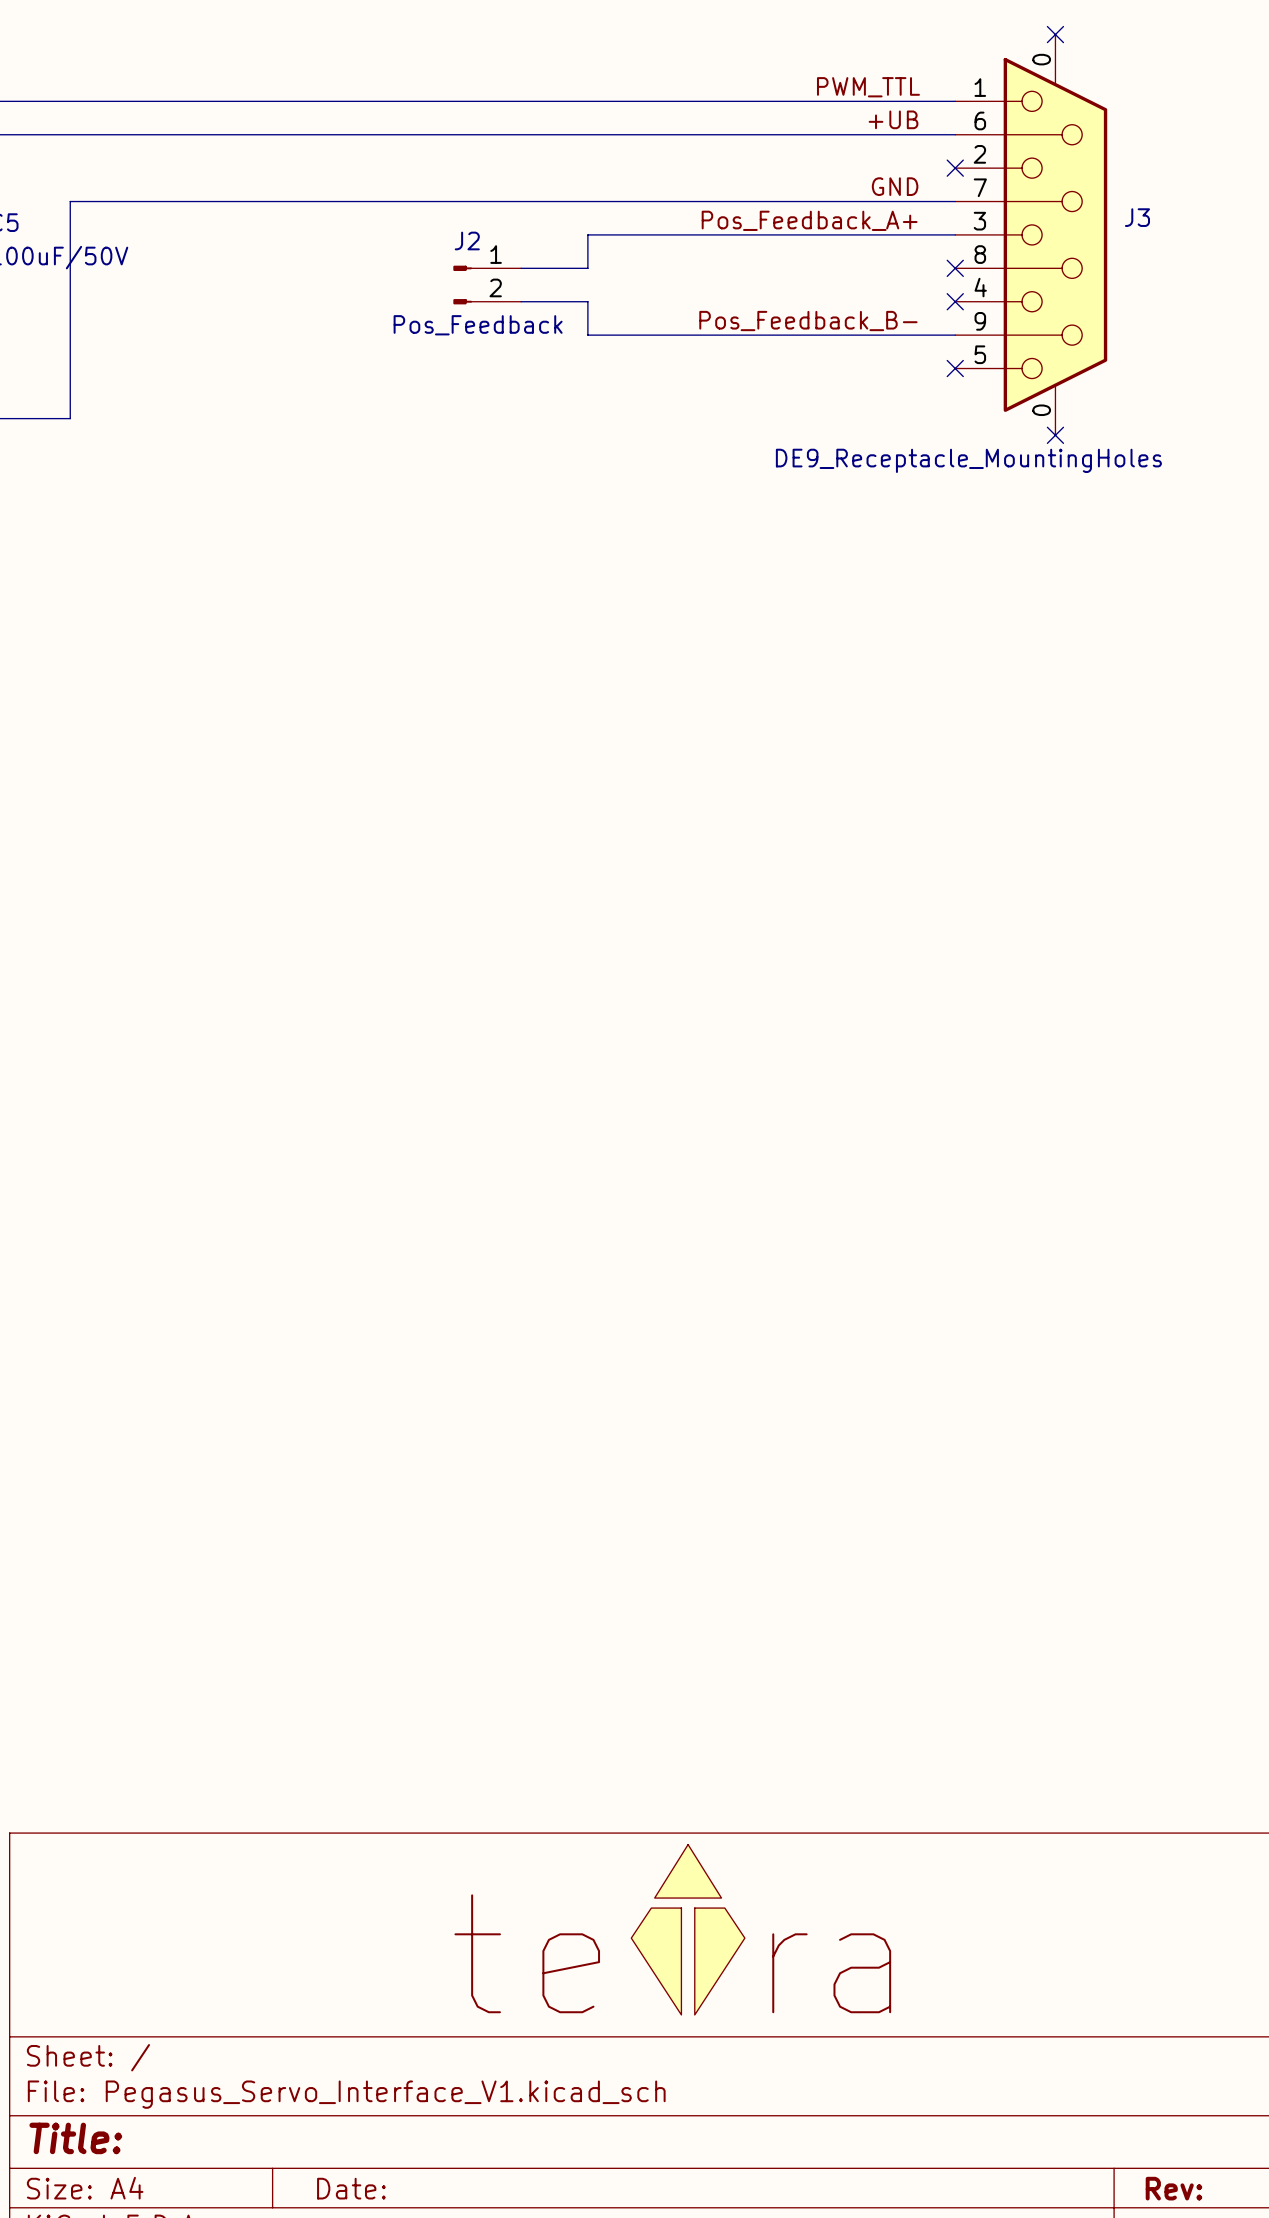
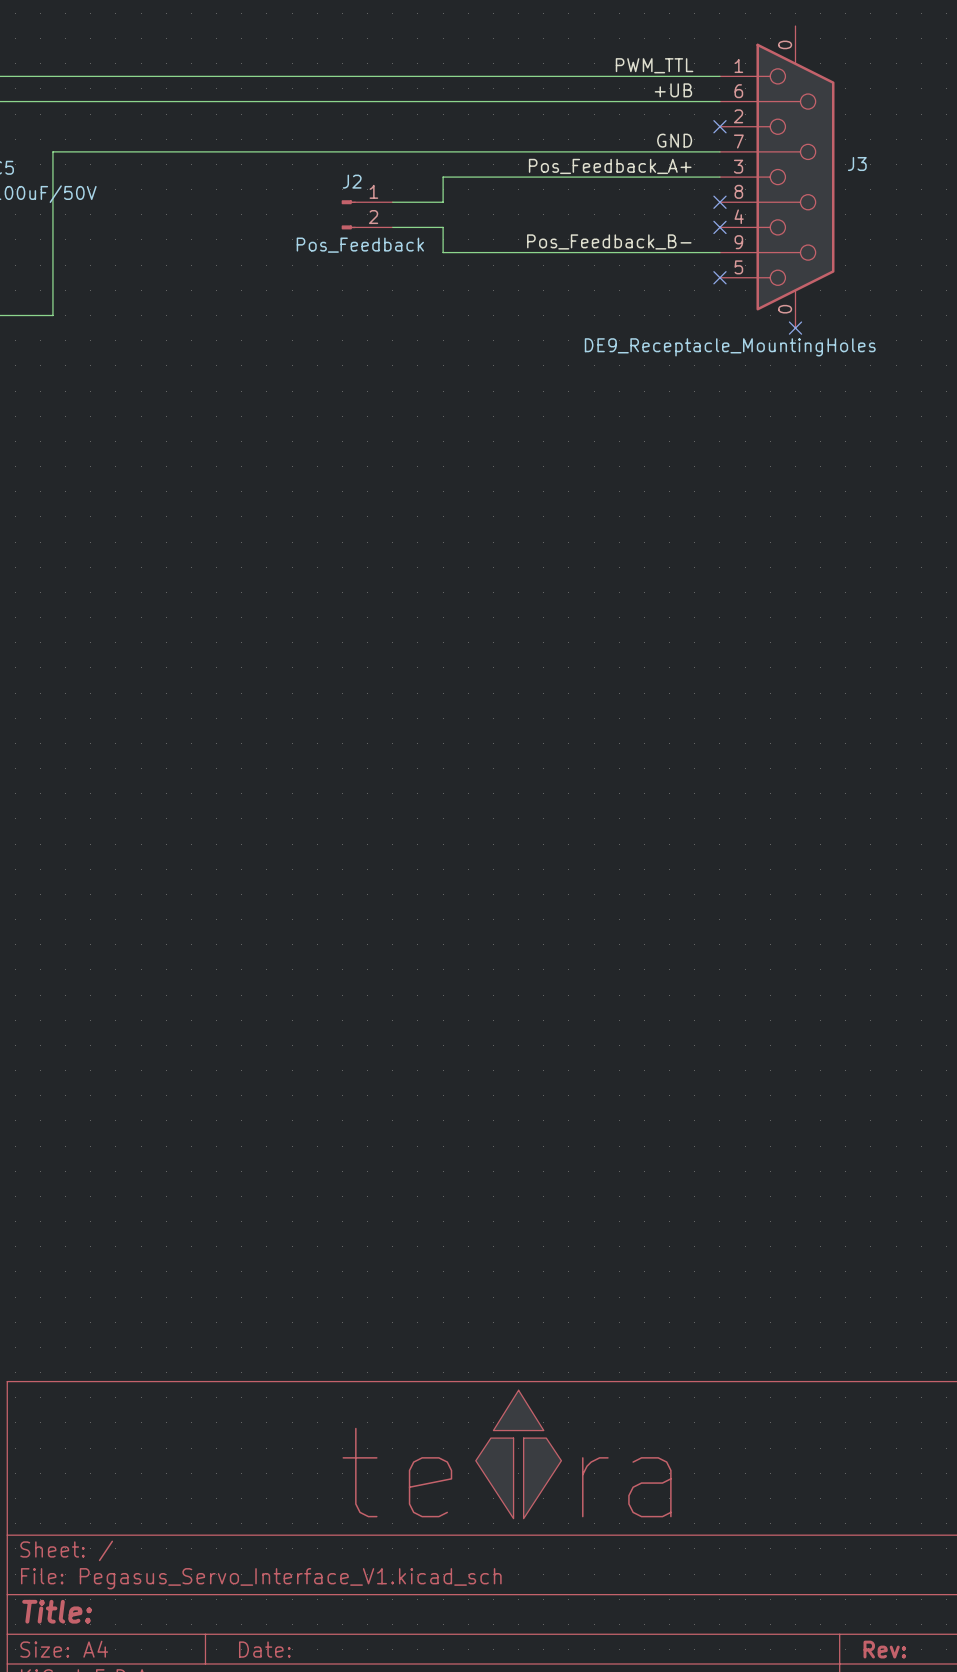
no-connect mark: (1055, 34) -> none

